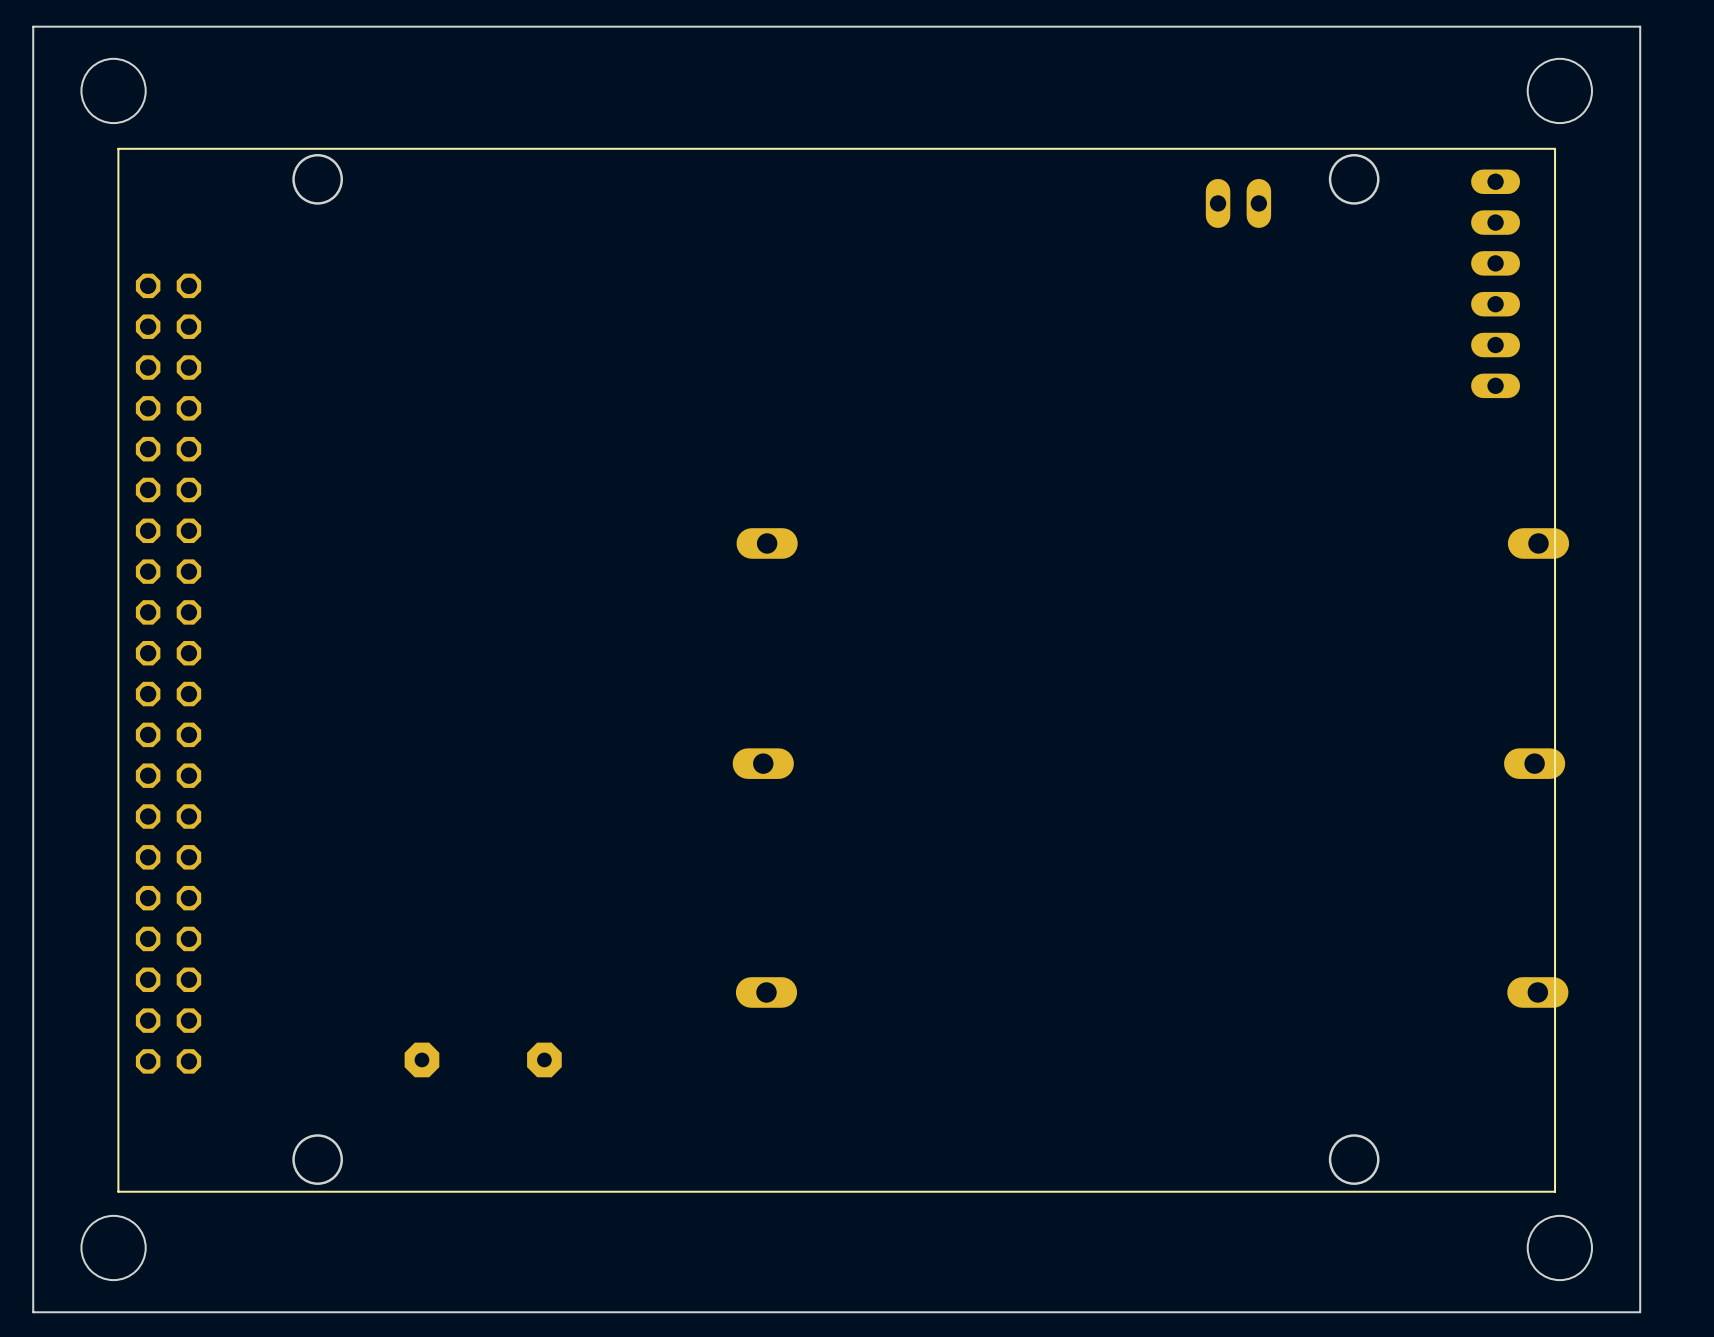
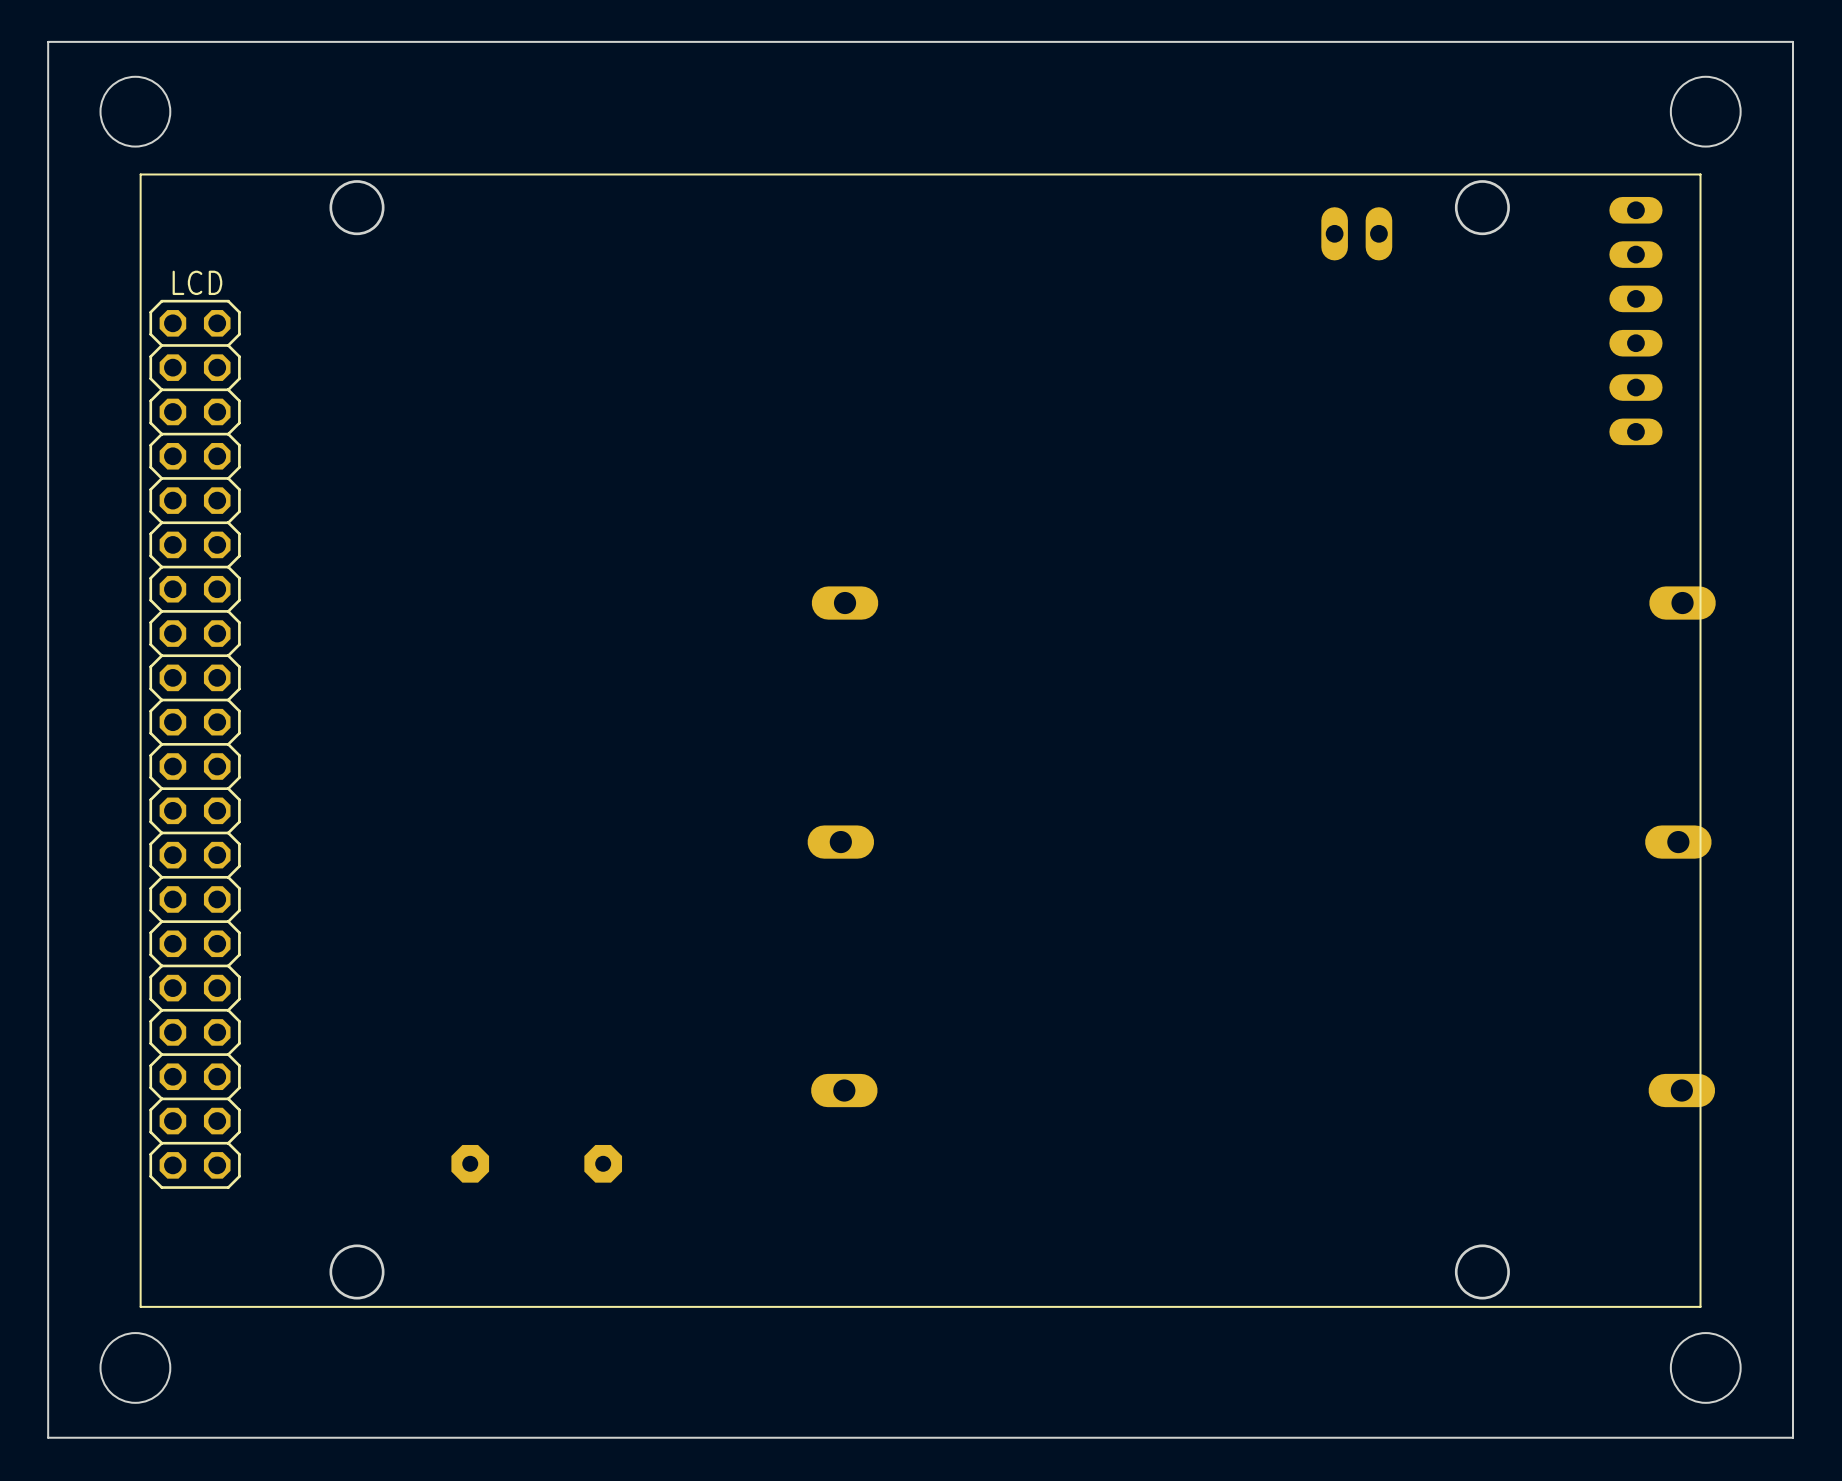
LCD side: top (168, 673) -> bottom (195, 744)

